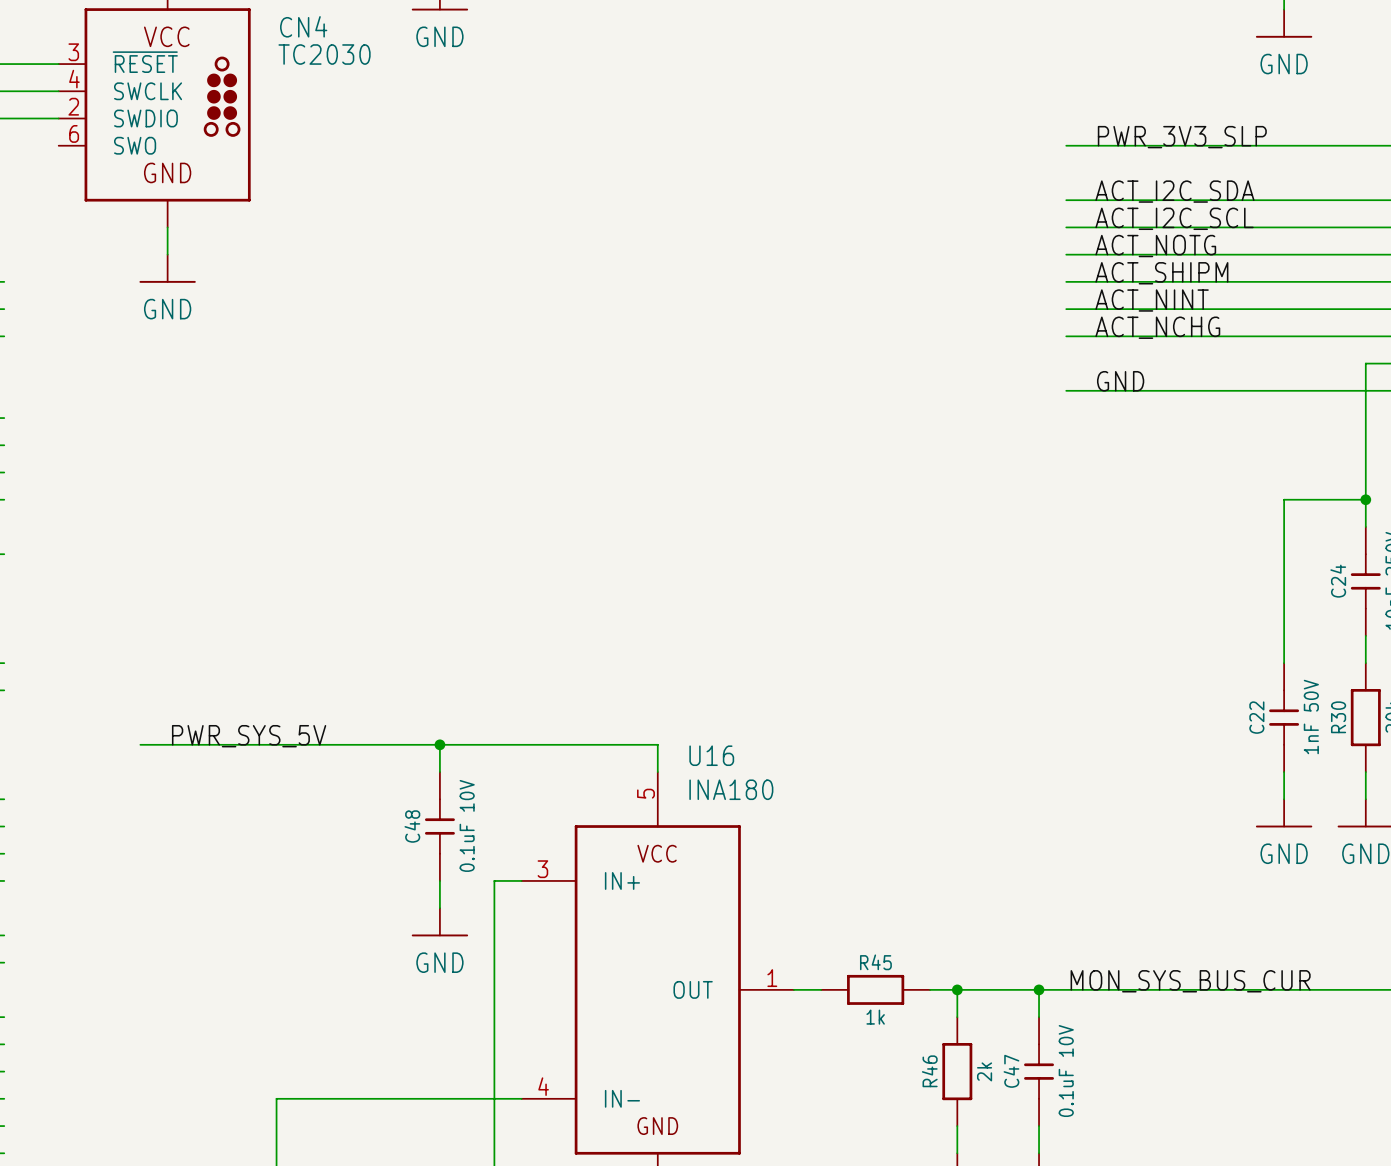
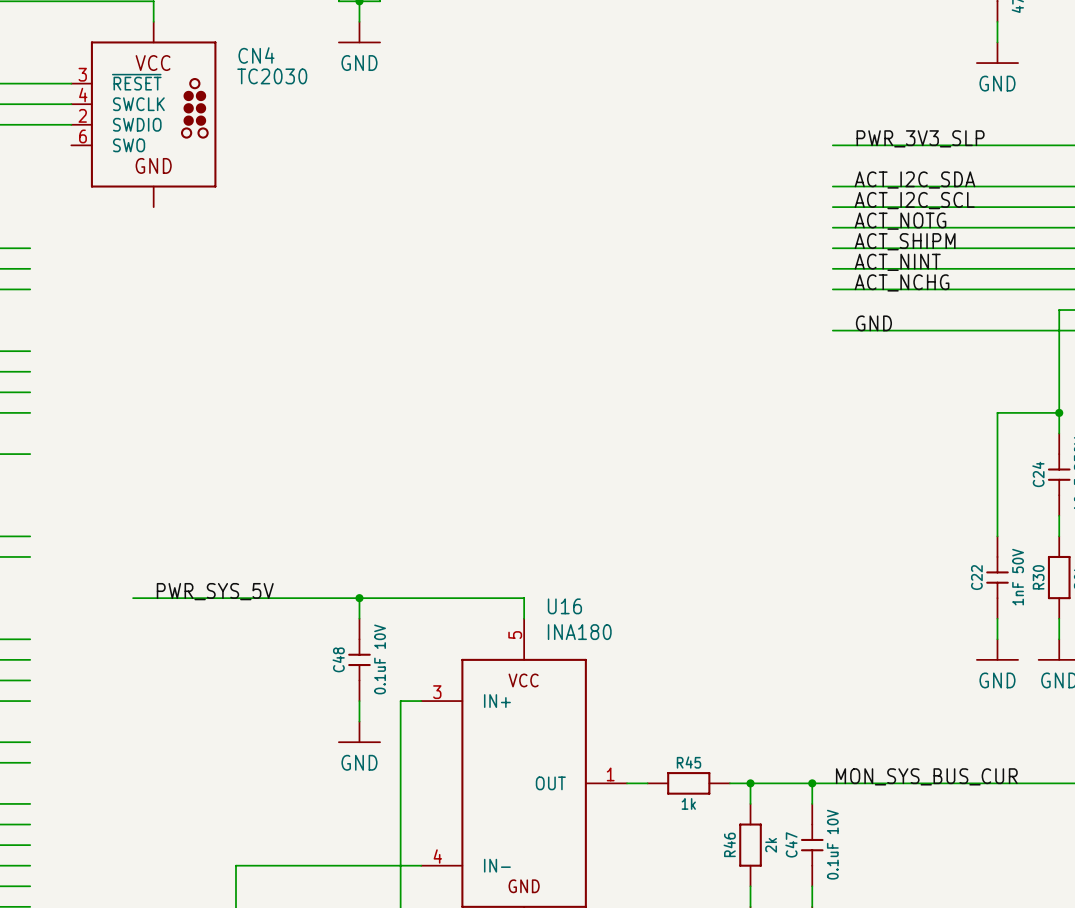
wire: (167, 227) (167, 254) -> none
power symbol: GND (167, 268) -> none

